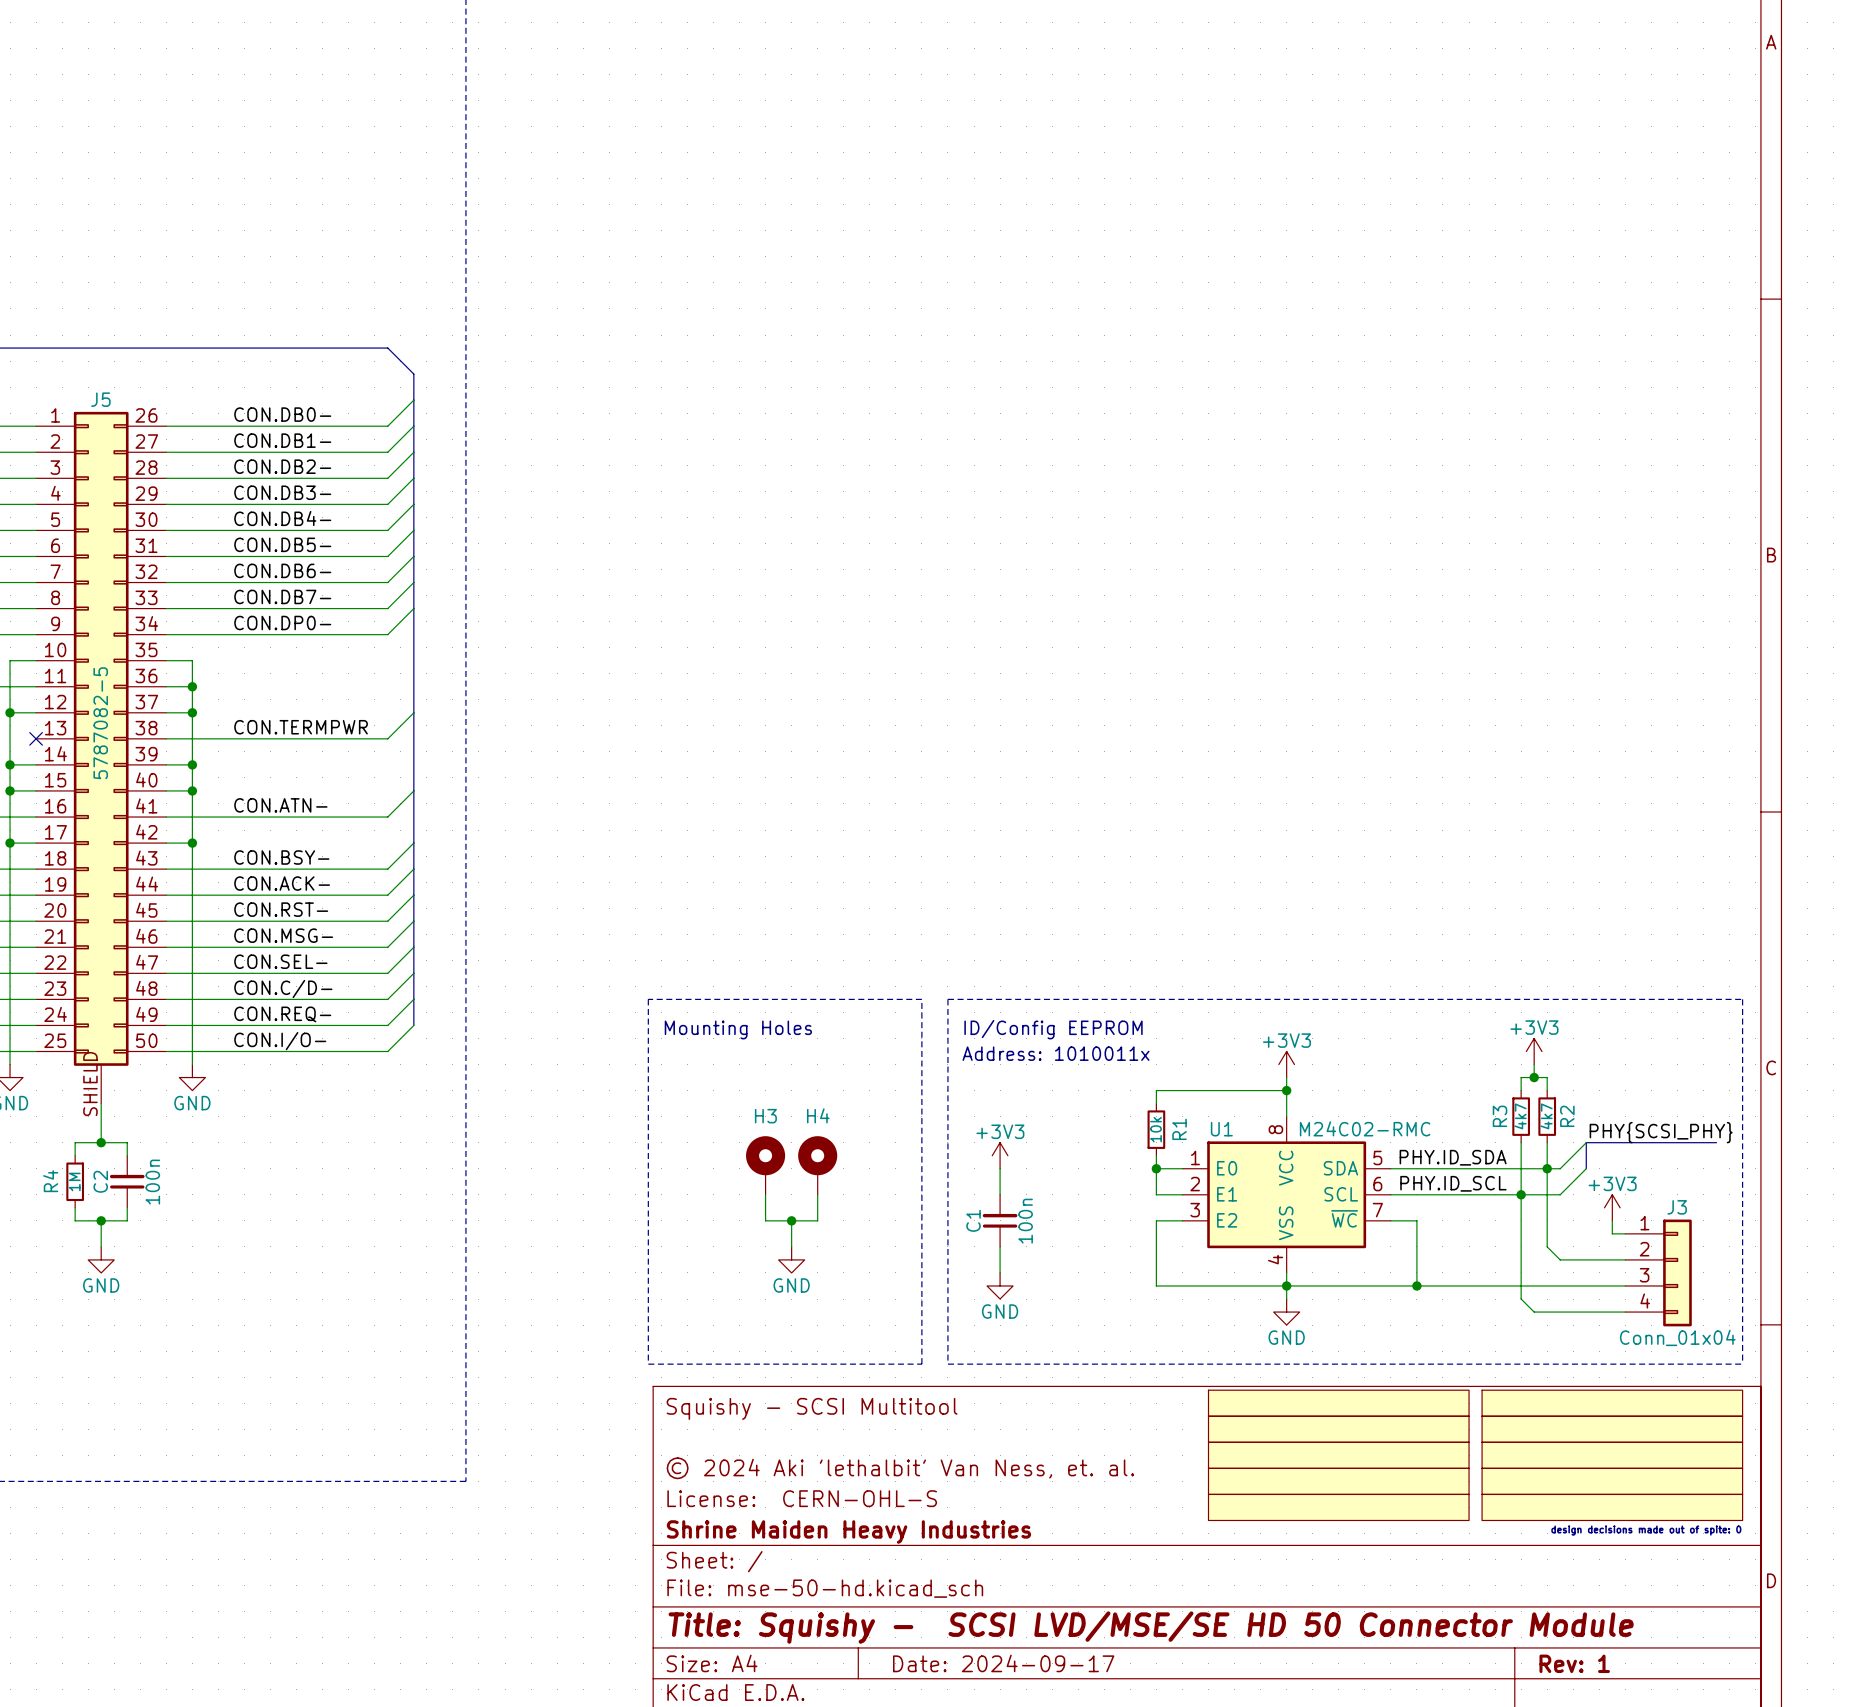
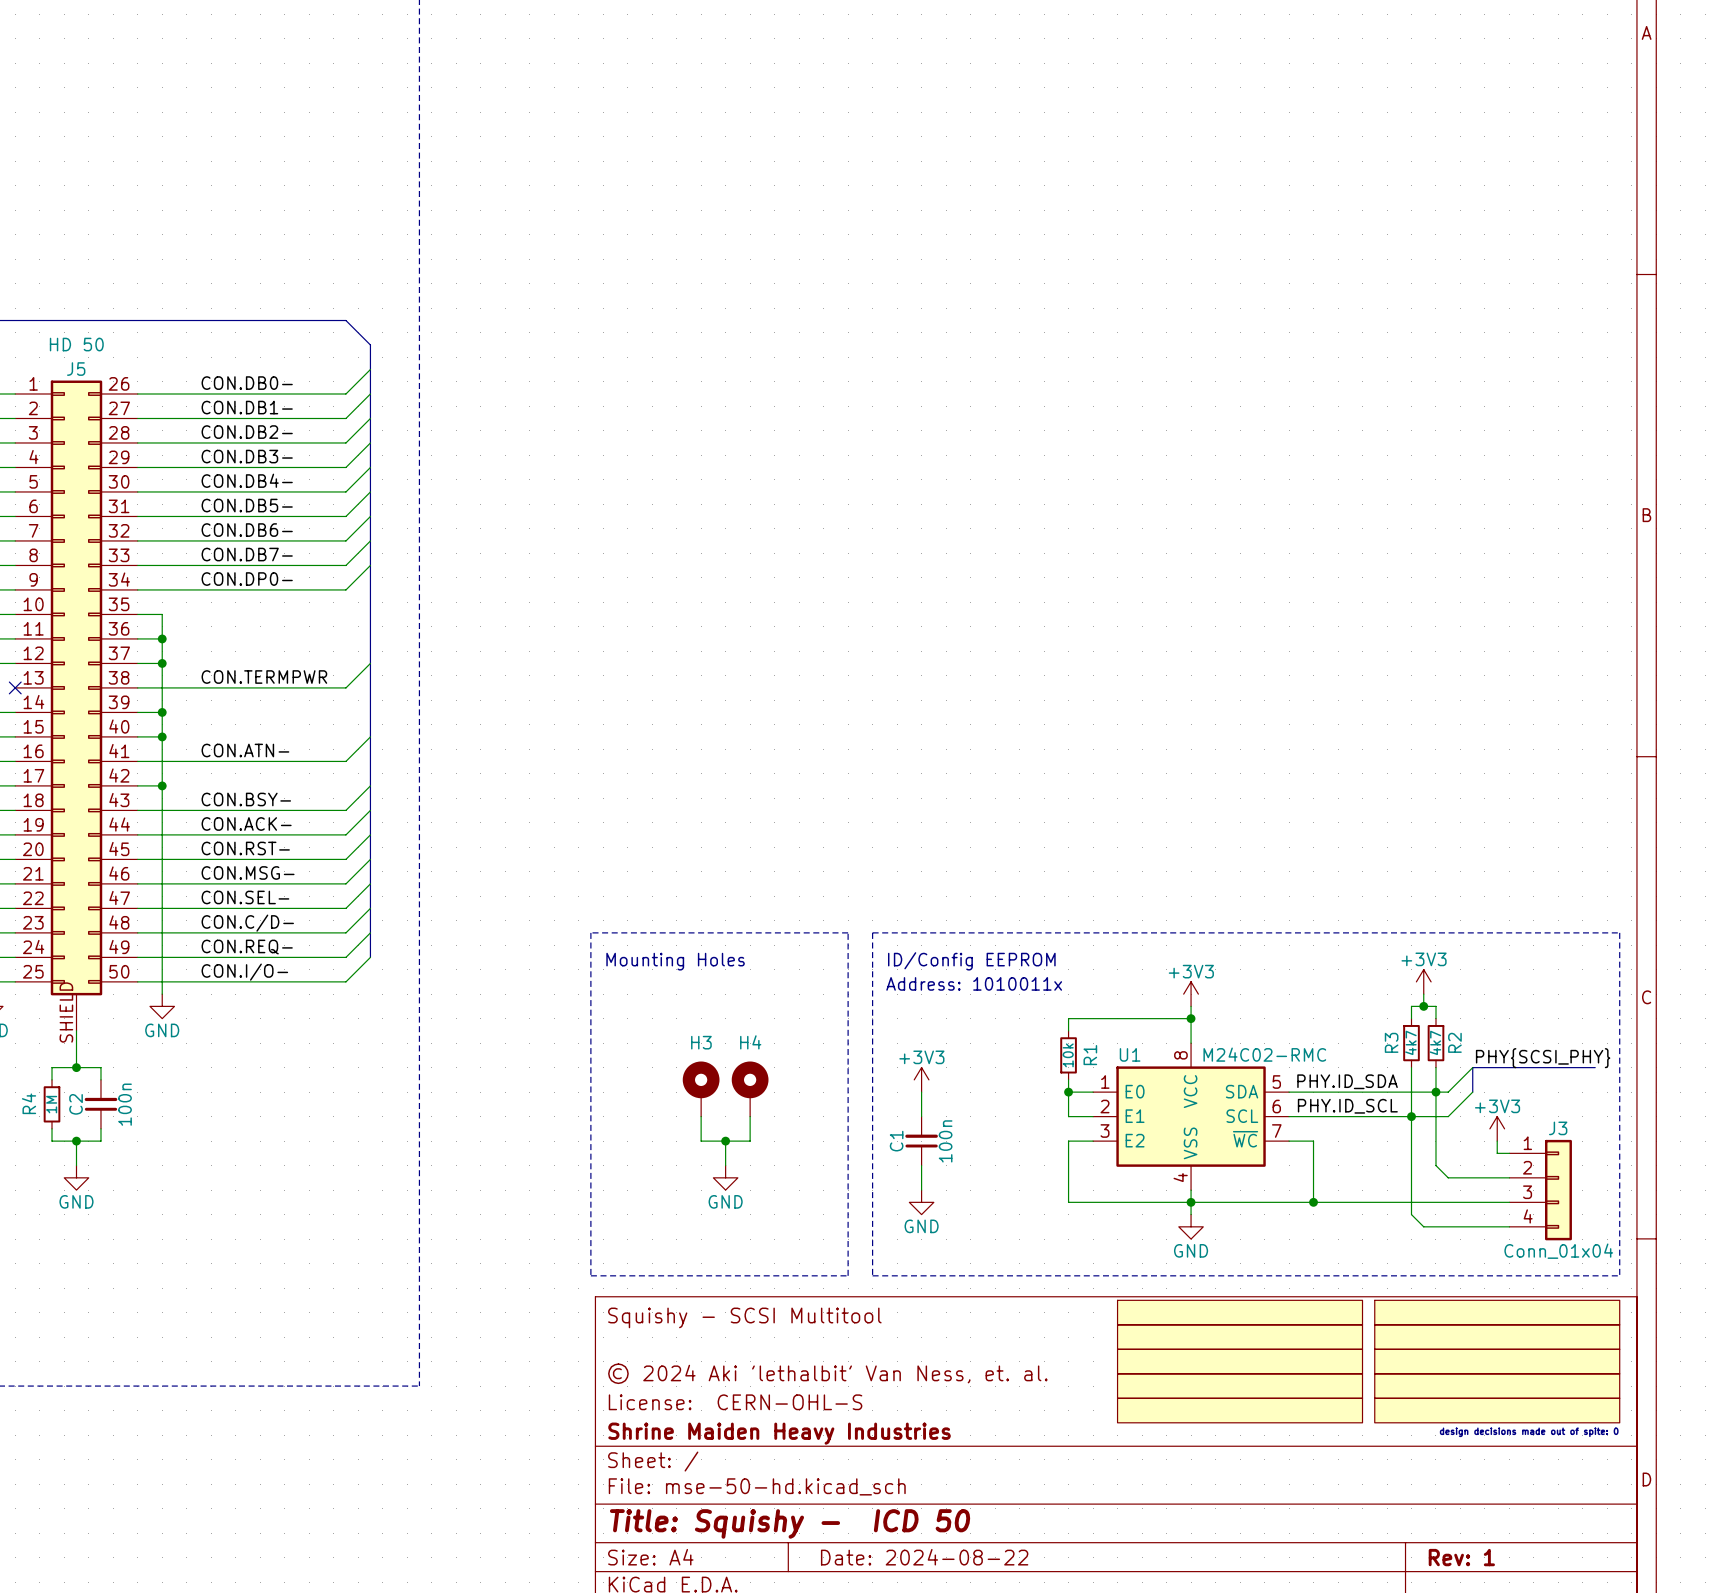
J5 value: 5787082-5 (100, 723) -> HD 50 (76, 344)
title block: Title: Squishy - SCSI LVD/MSE/SE HD 50 Connector Module (1151, 1627) -> Title: Squishy - ICD 50 (790, 1523)
title block: Date: 2024-09-17 (1003, 1663) -> Date: 2024-08-22 (924, 1557)

